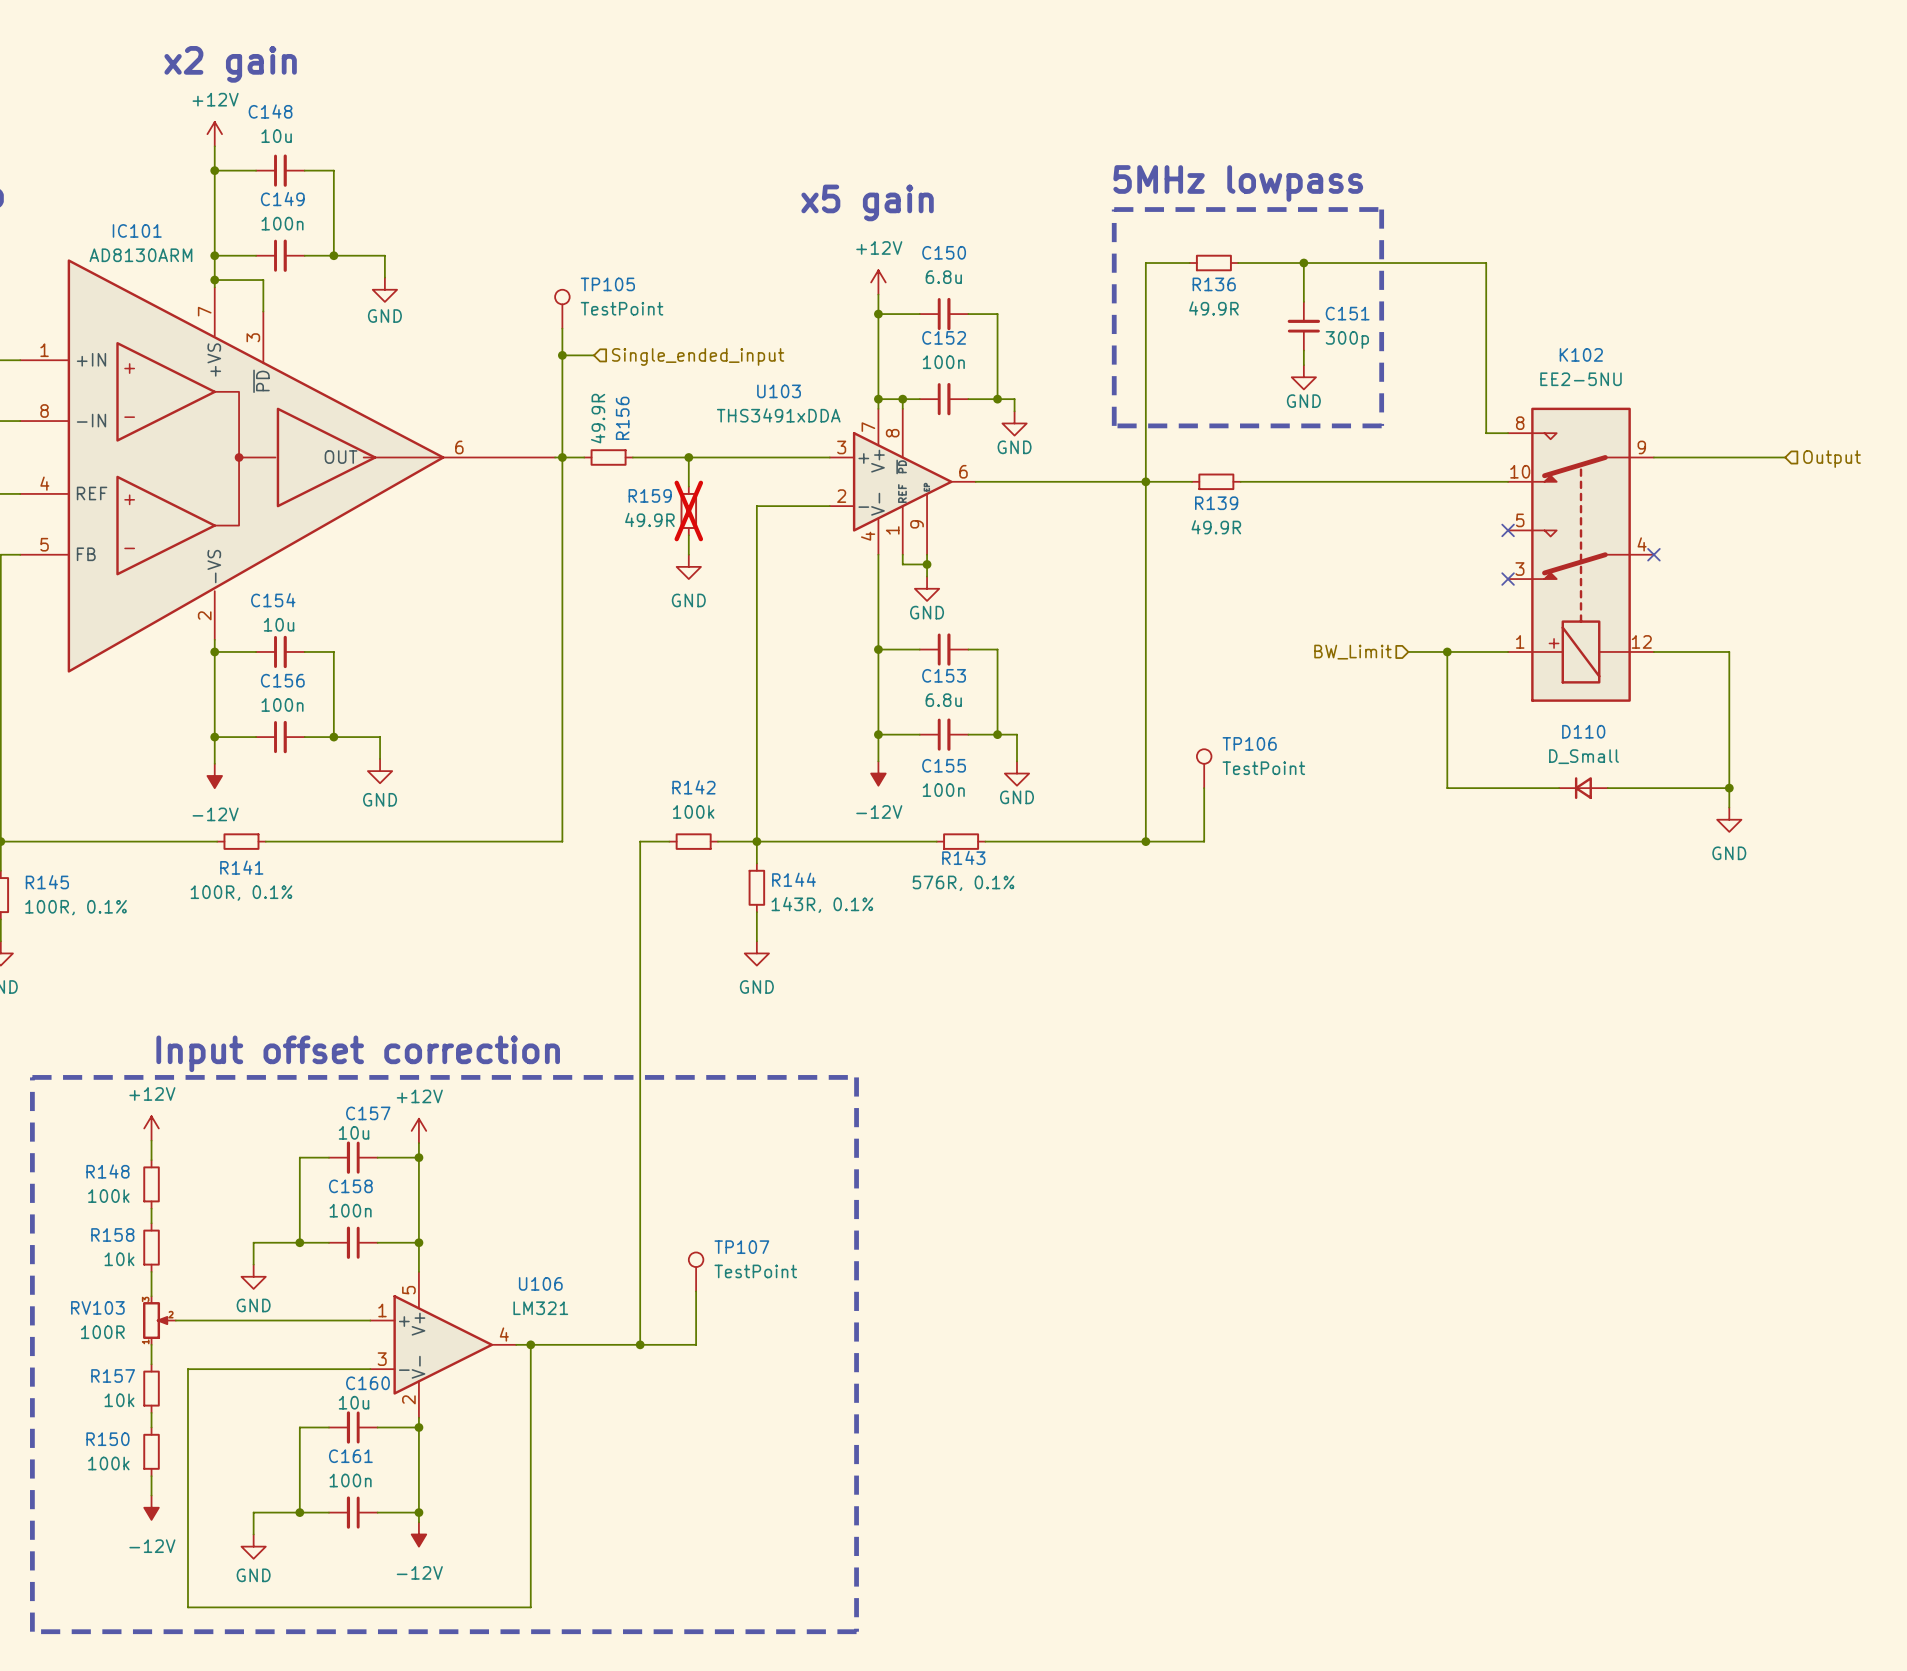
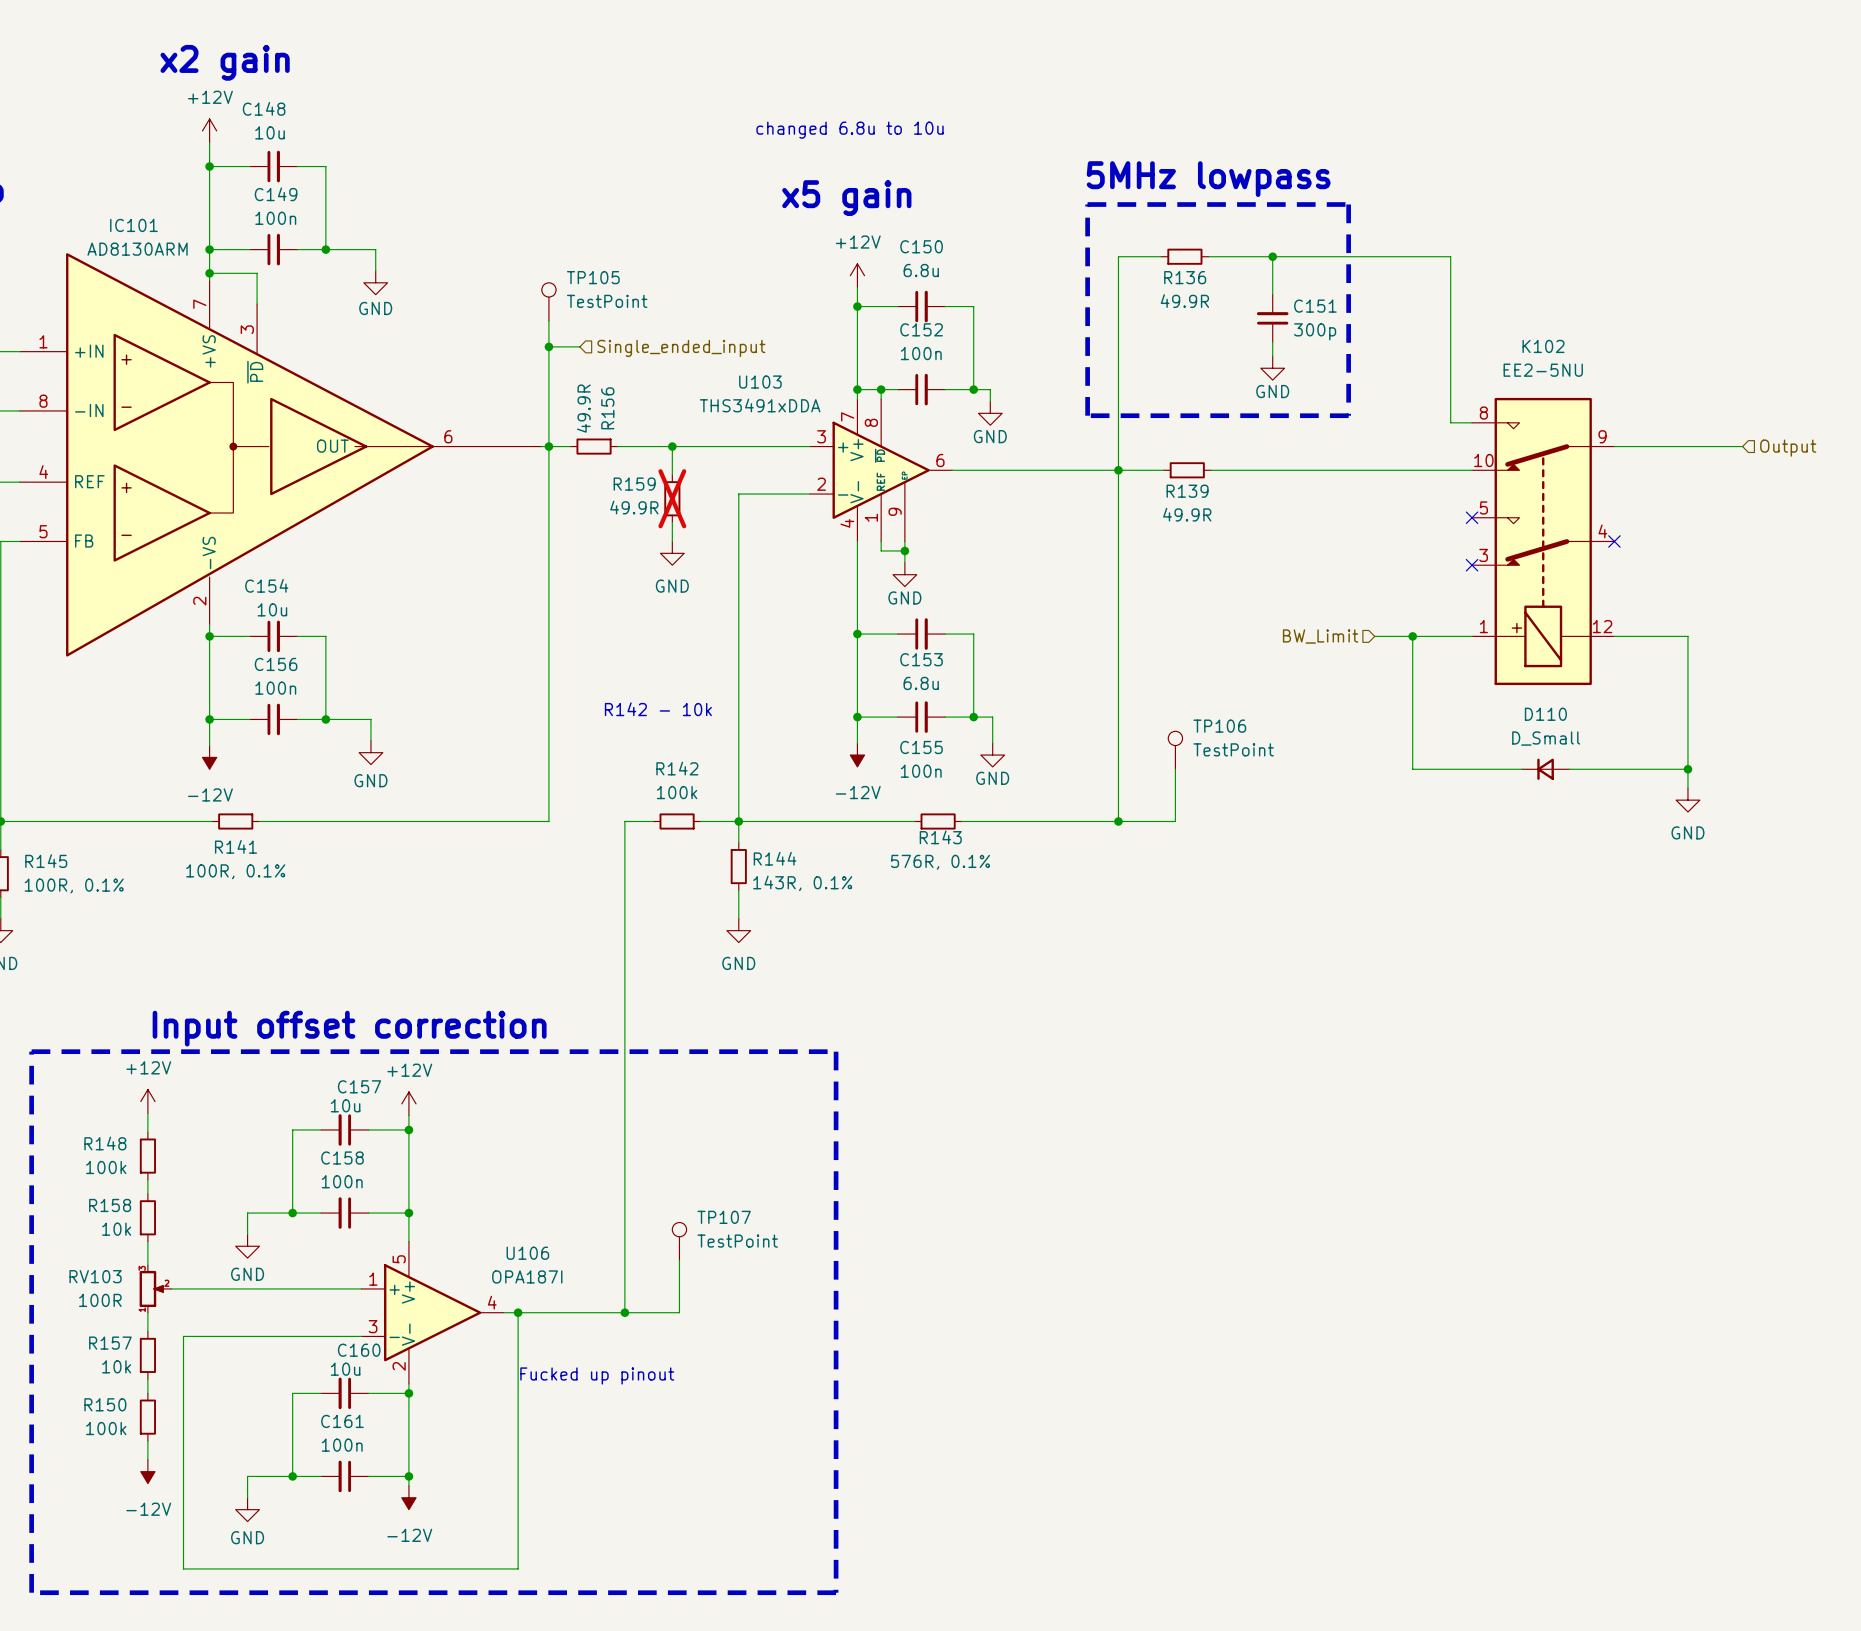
text: none -> changed 6.8u to 10u (850, 130)
text: none -> R142 - 10k (658, 709)
U106 value: LM321 (540, 1308) -> OPA187I (527, 1276)
text: none -> Fucked up pinout (597, 1375)

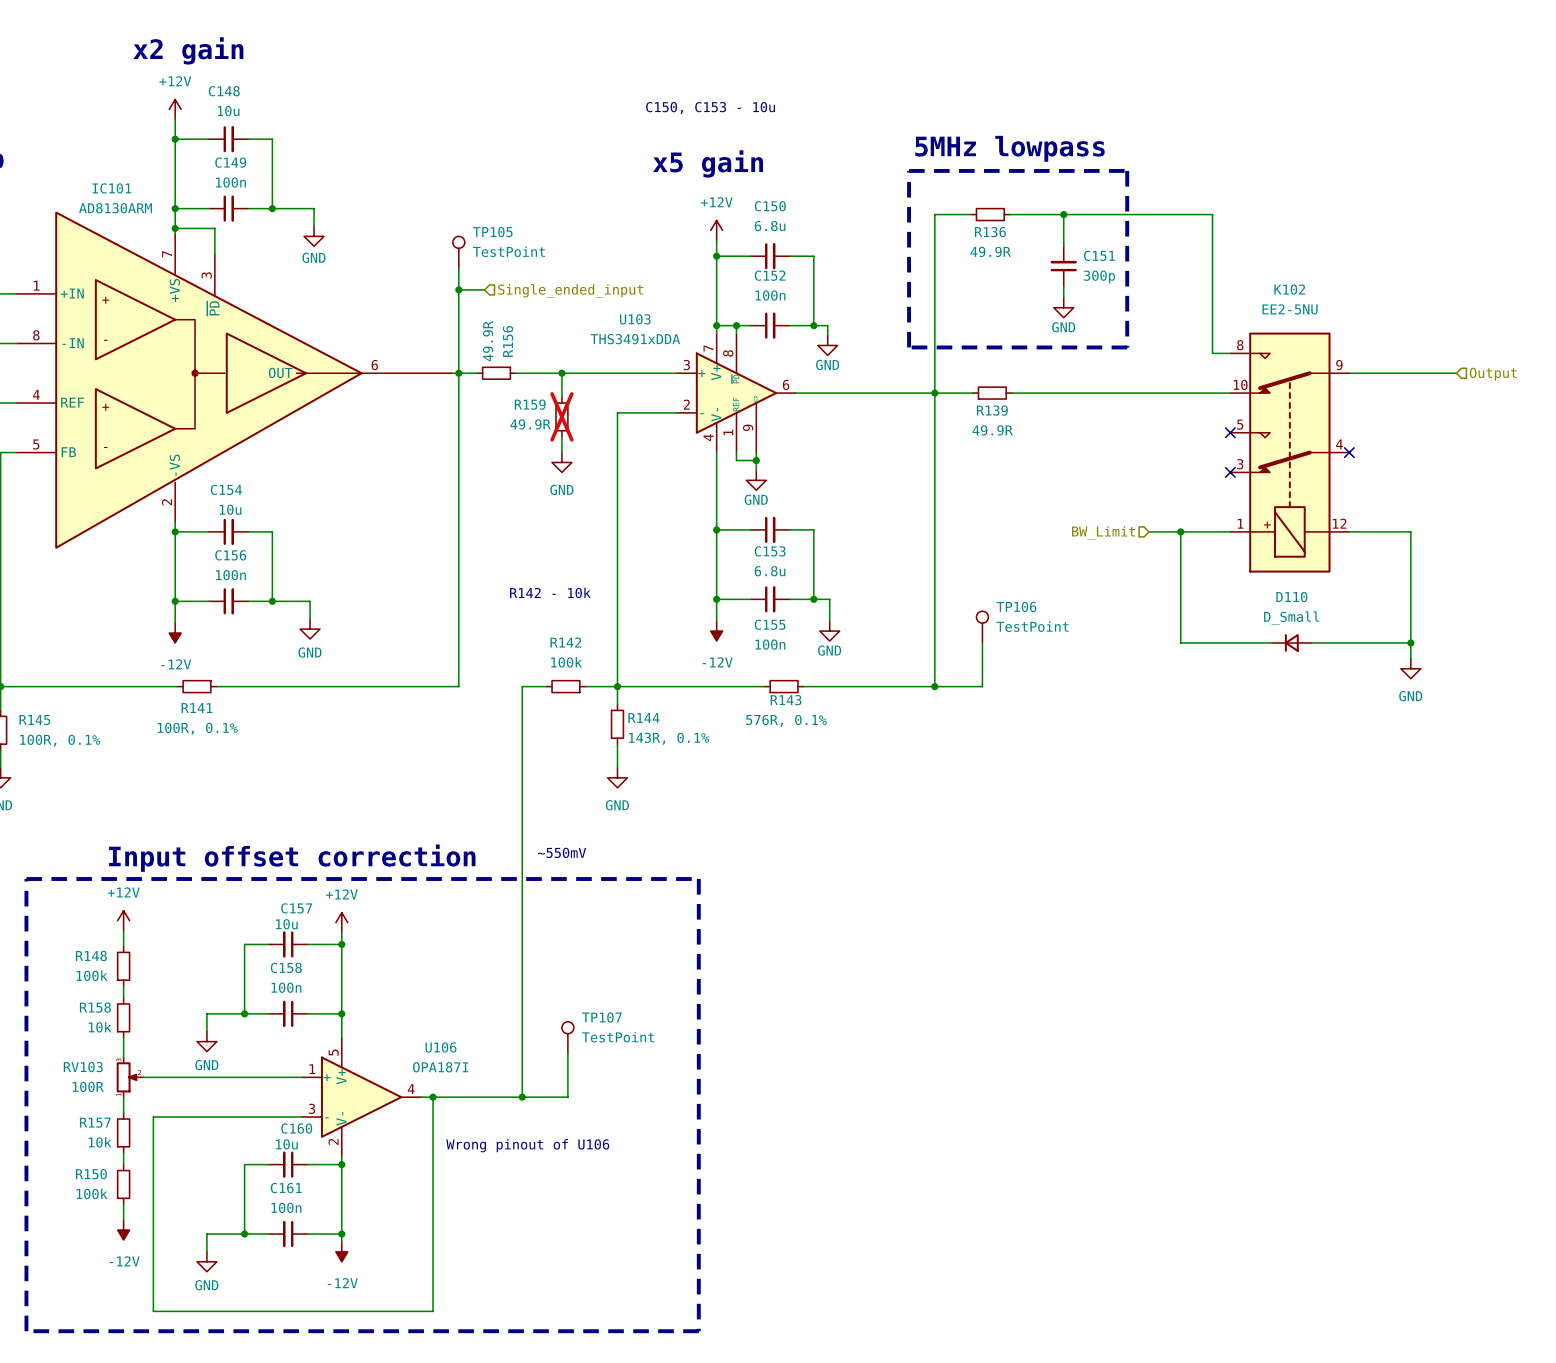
text: changed 6.8u to 10u (850, 130) -> C150, C153 - 10u (710, 107)
text: none -> ~550mV (562, 852)
text: none -> Wrong pinout of U106 (527, 1145)
text: Fucked up pinout (597, 1375) -> none

